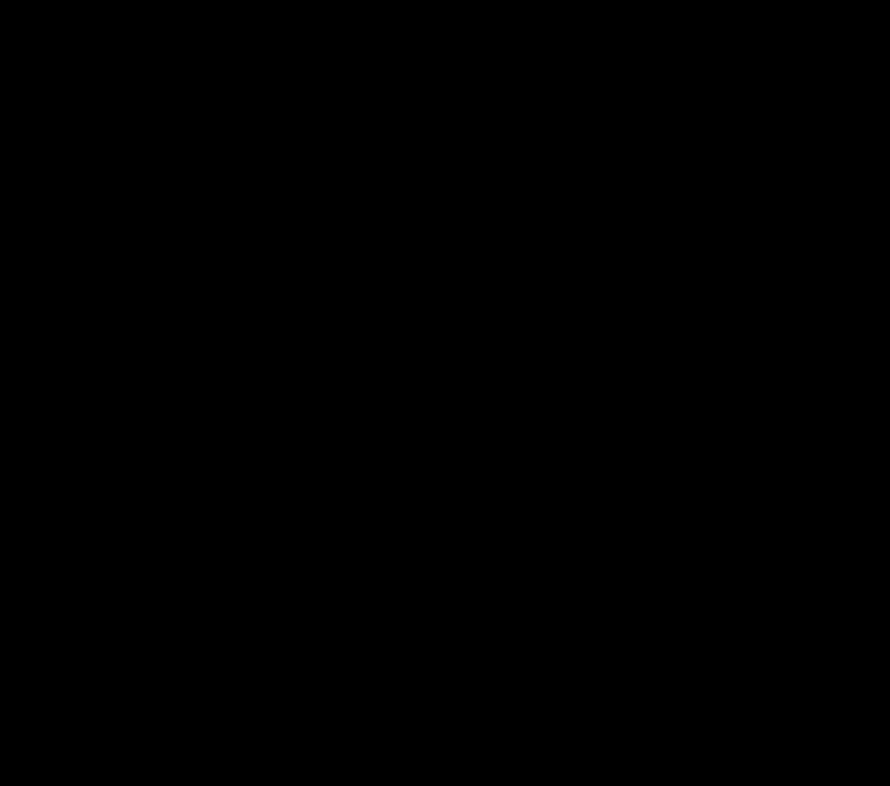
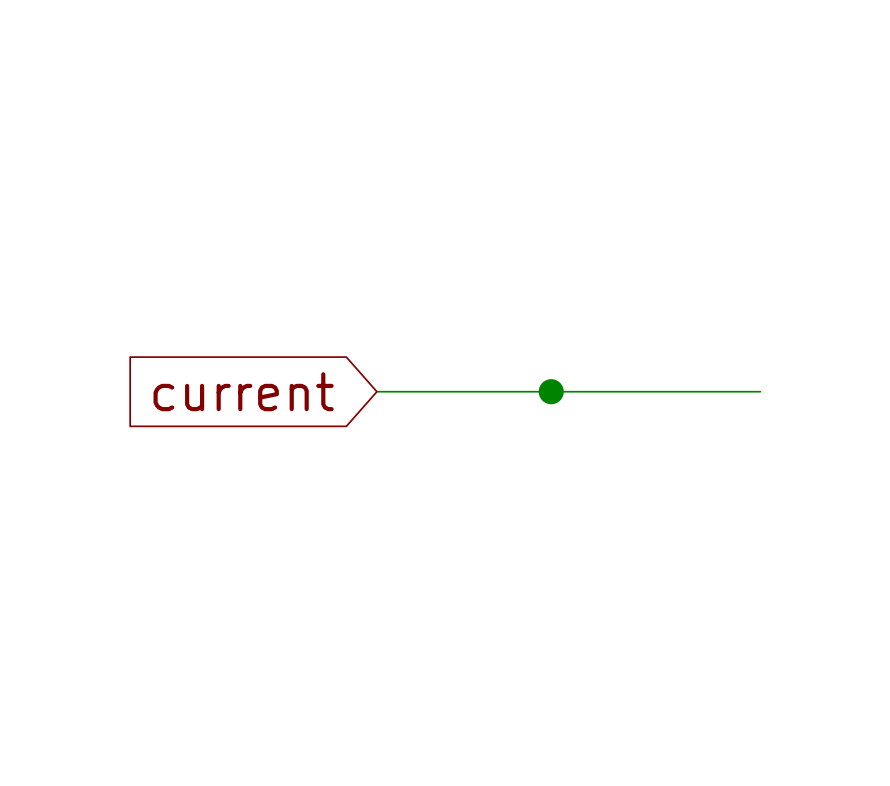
wire: none -> (376, 391) (760, 391)
junction: none -> (551, 391)
global label: none -> current (243, 391)

